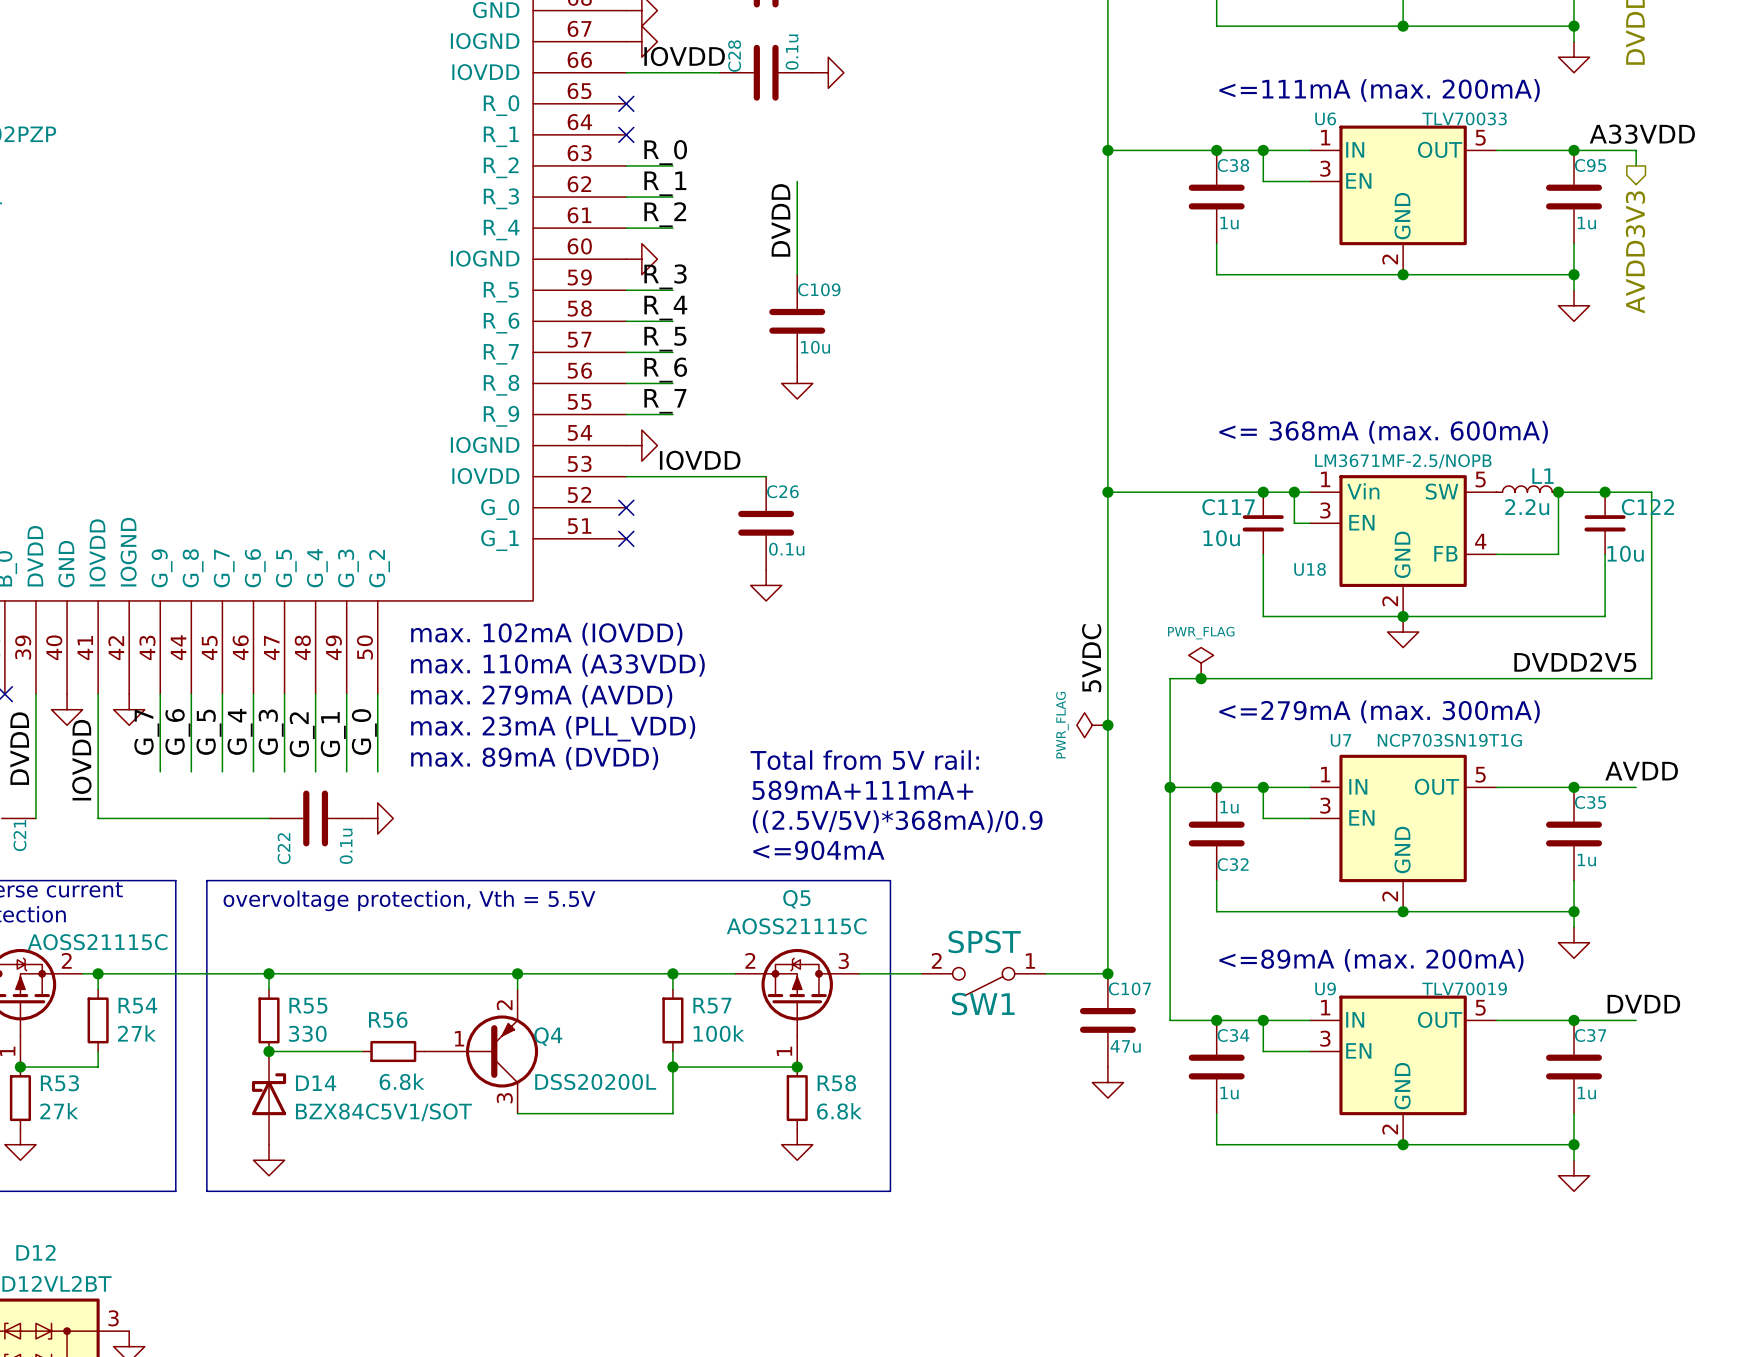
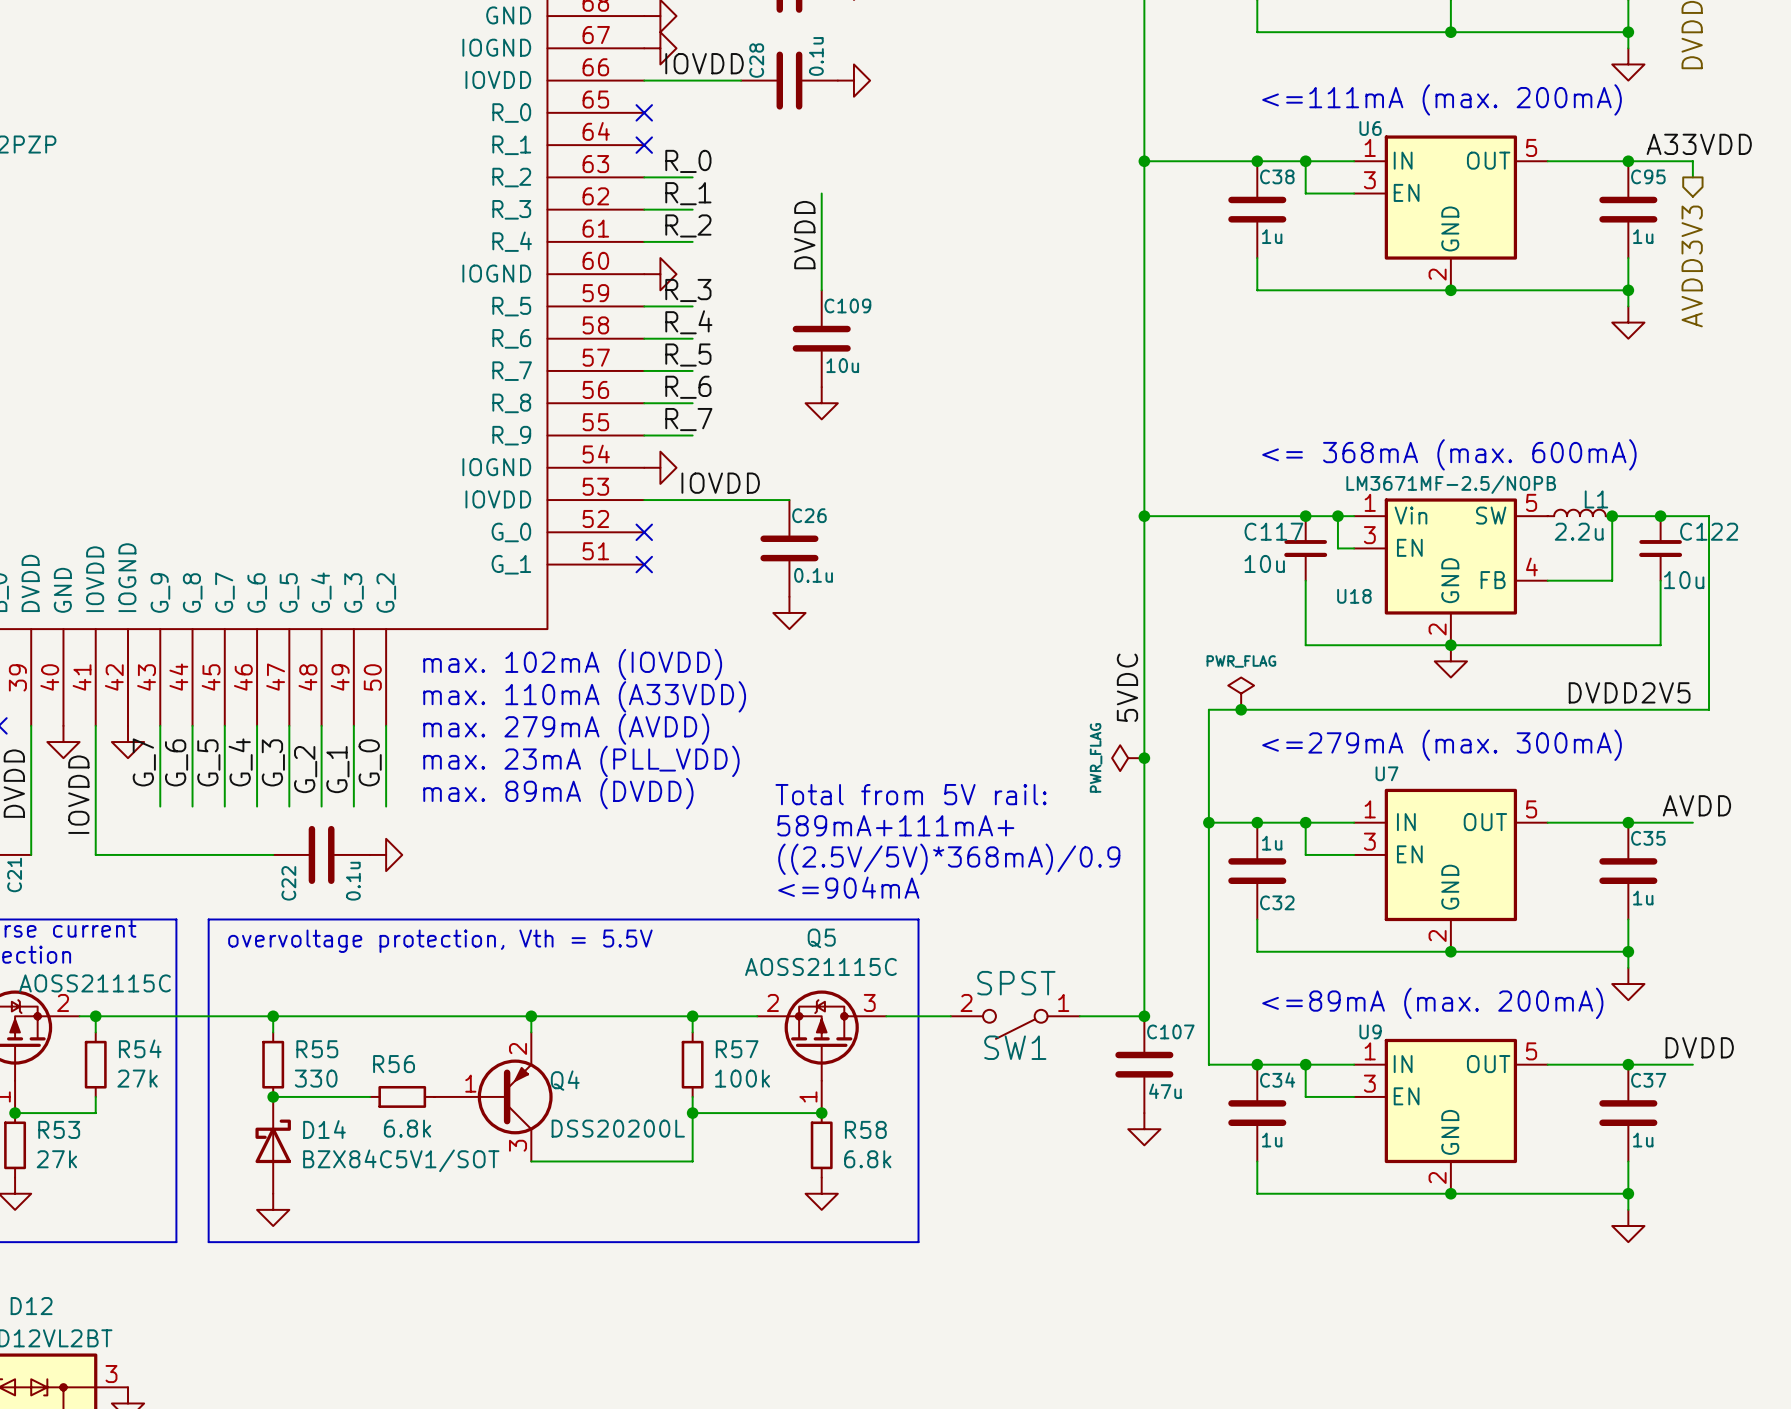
U6 value: TLV70033 (1464, 118) -> none
U7 value: NCP703SN19T1G (1449, 740) -> none
U9 value: TLV70019 (1464, 988) -> none

